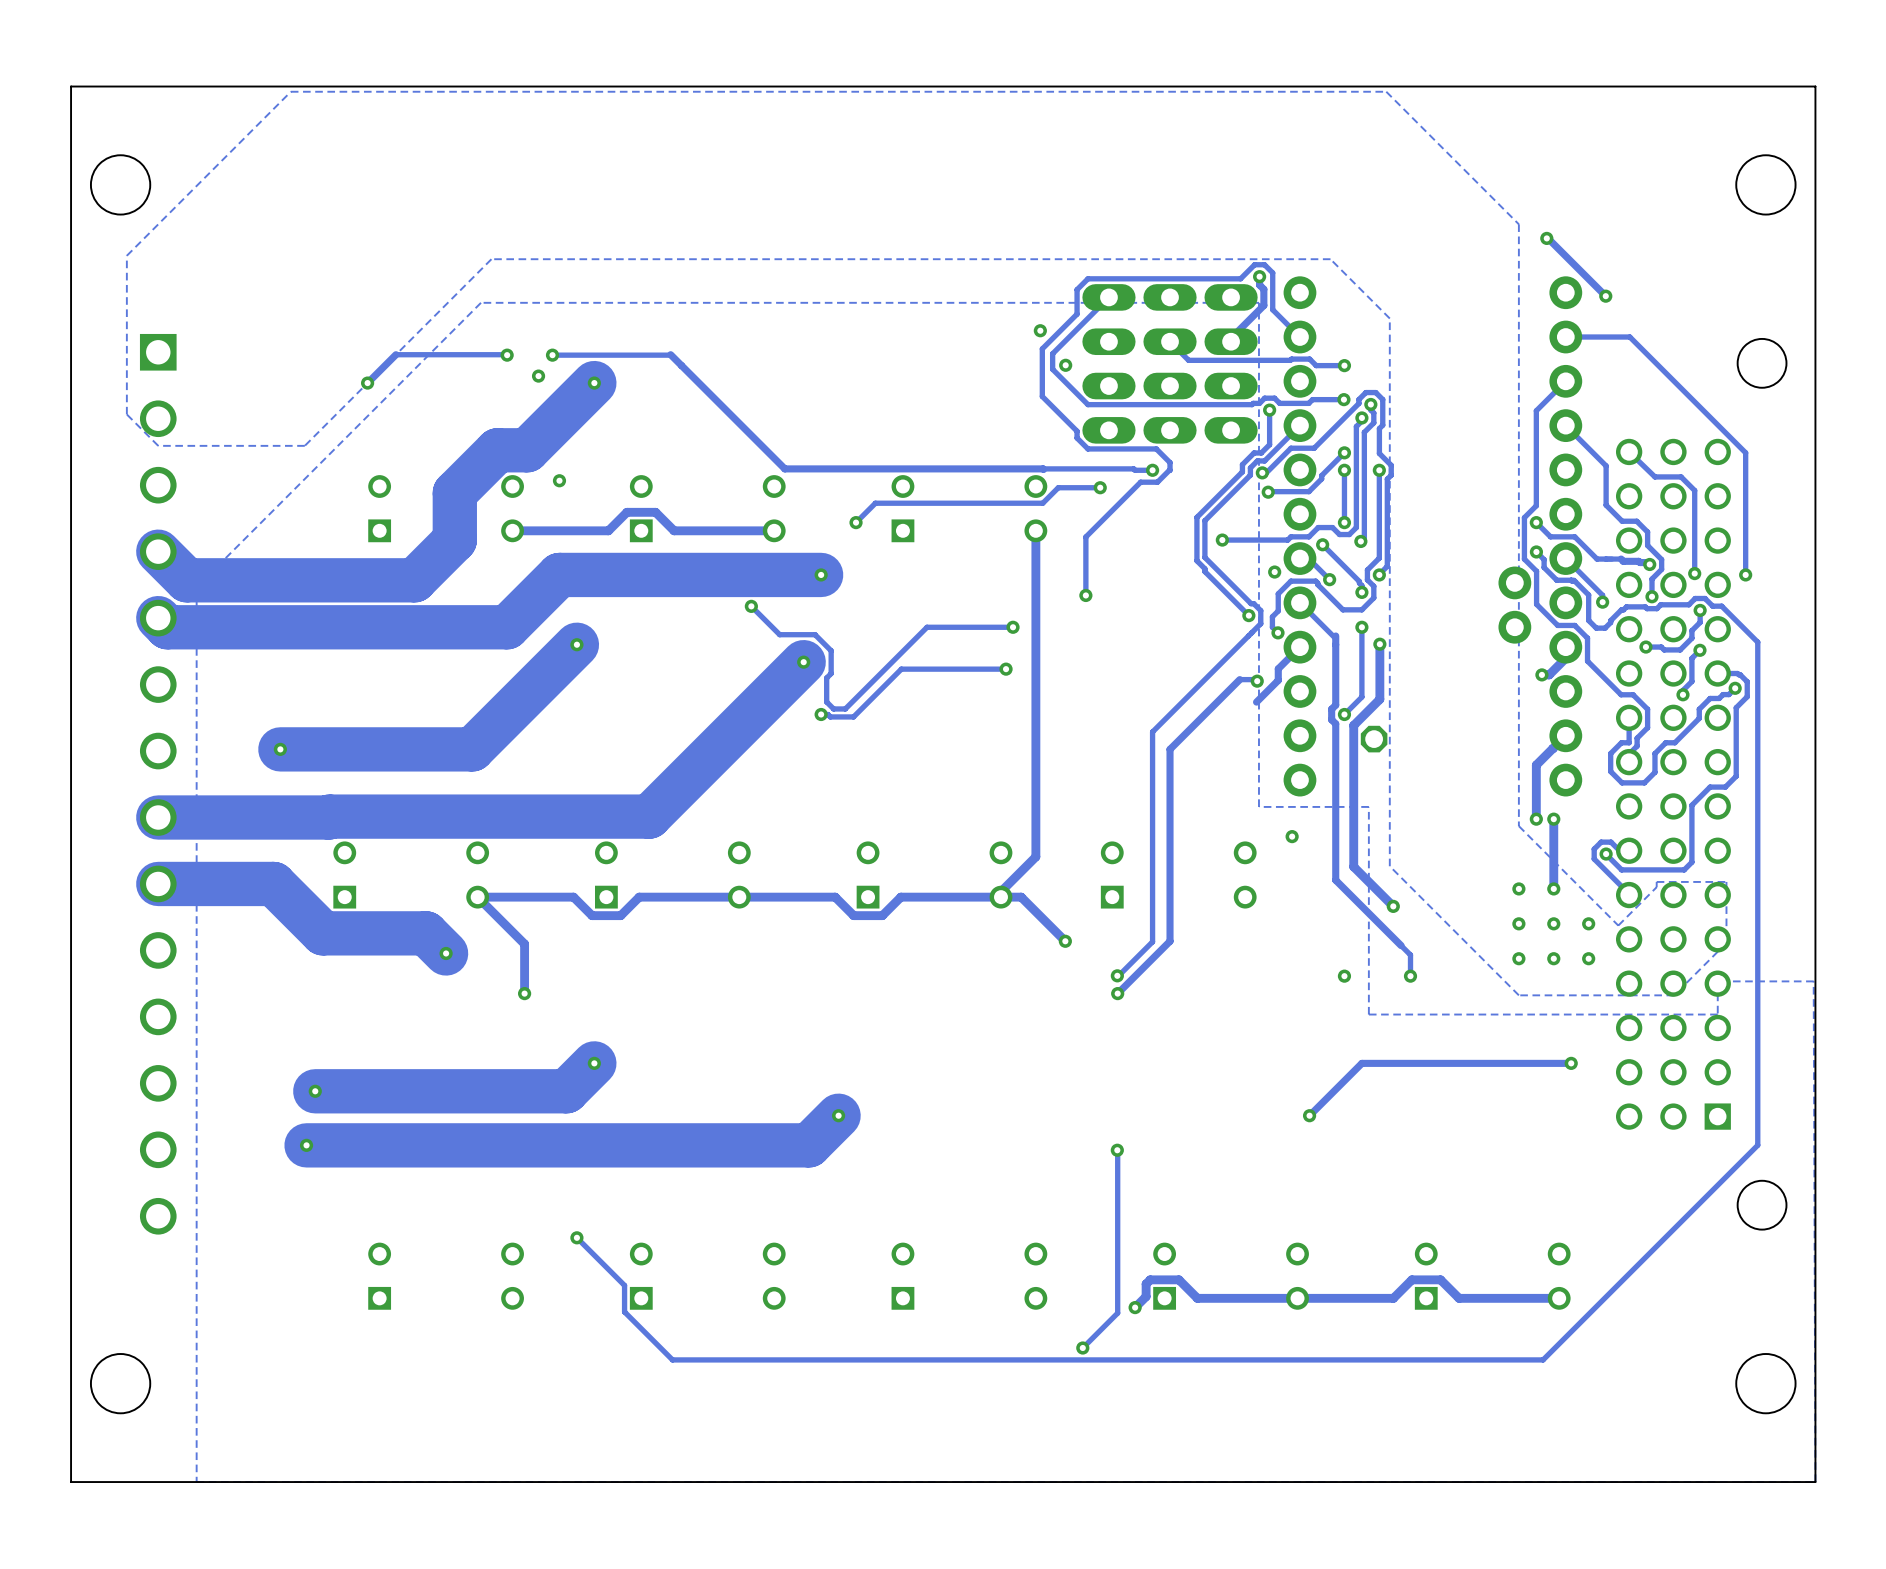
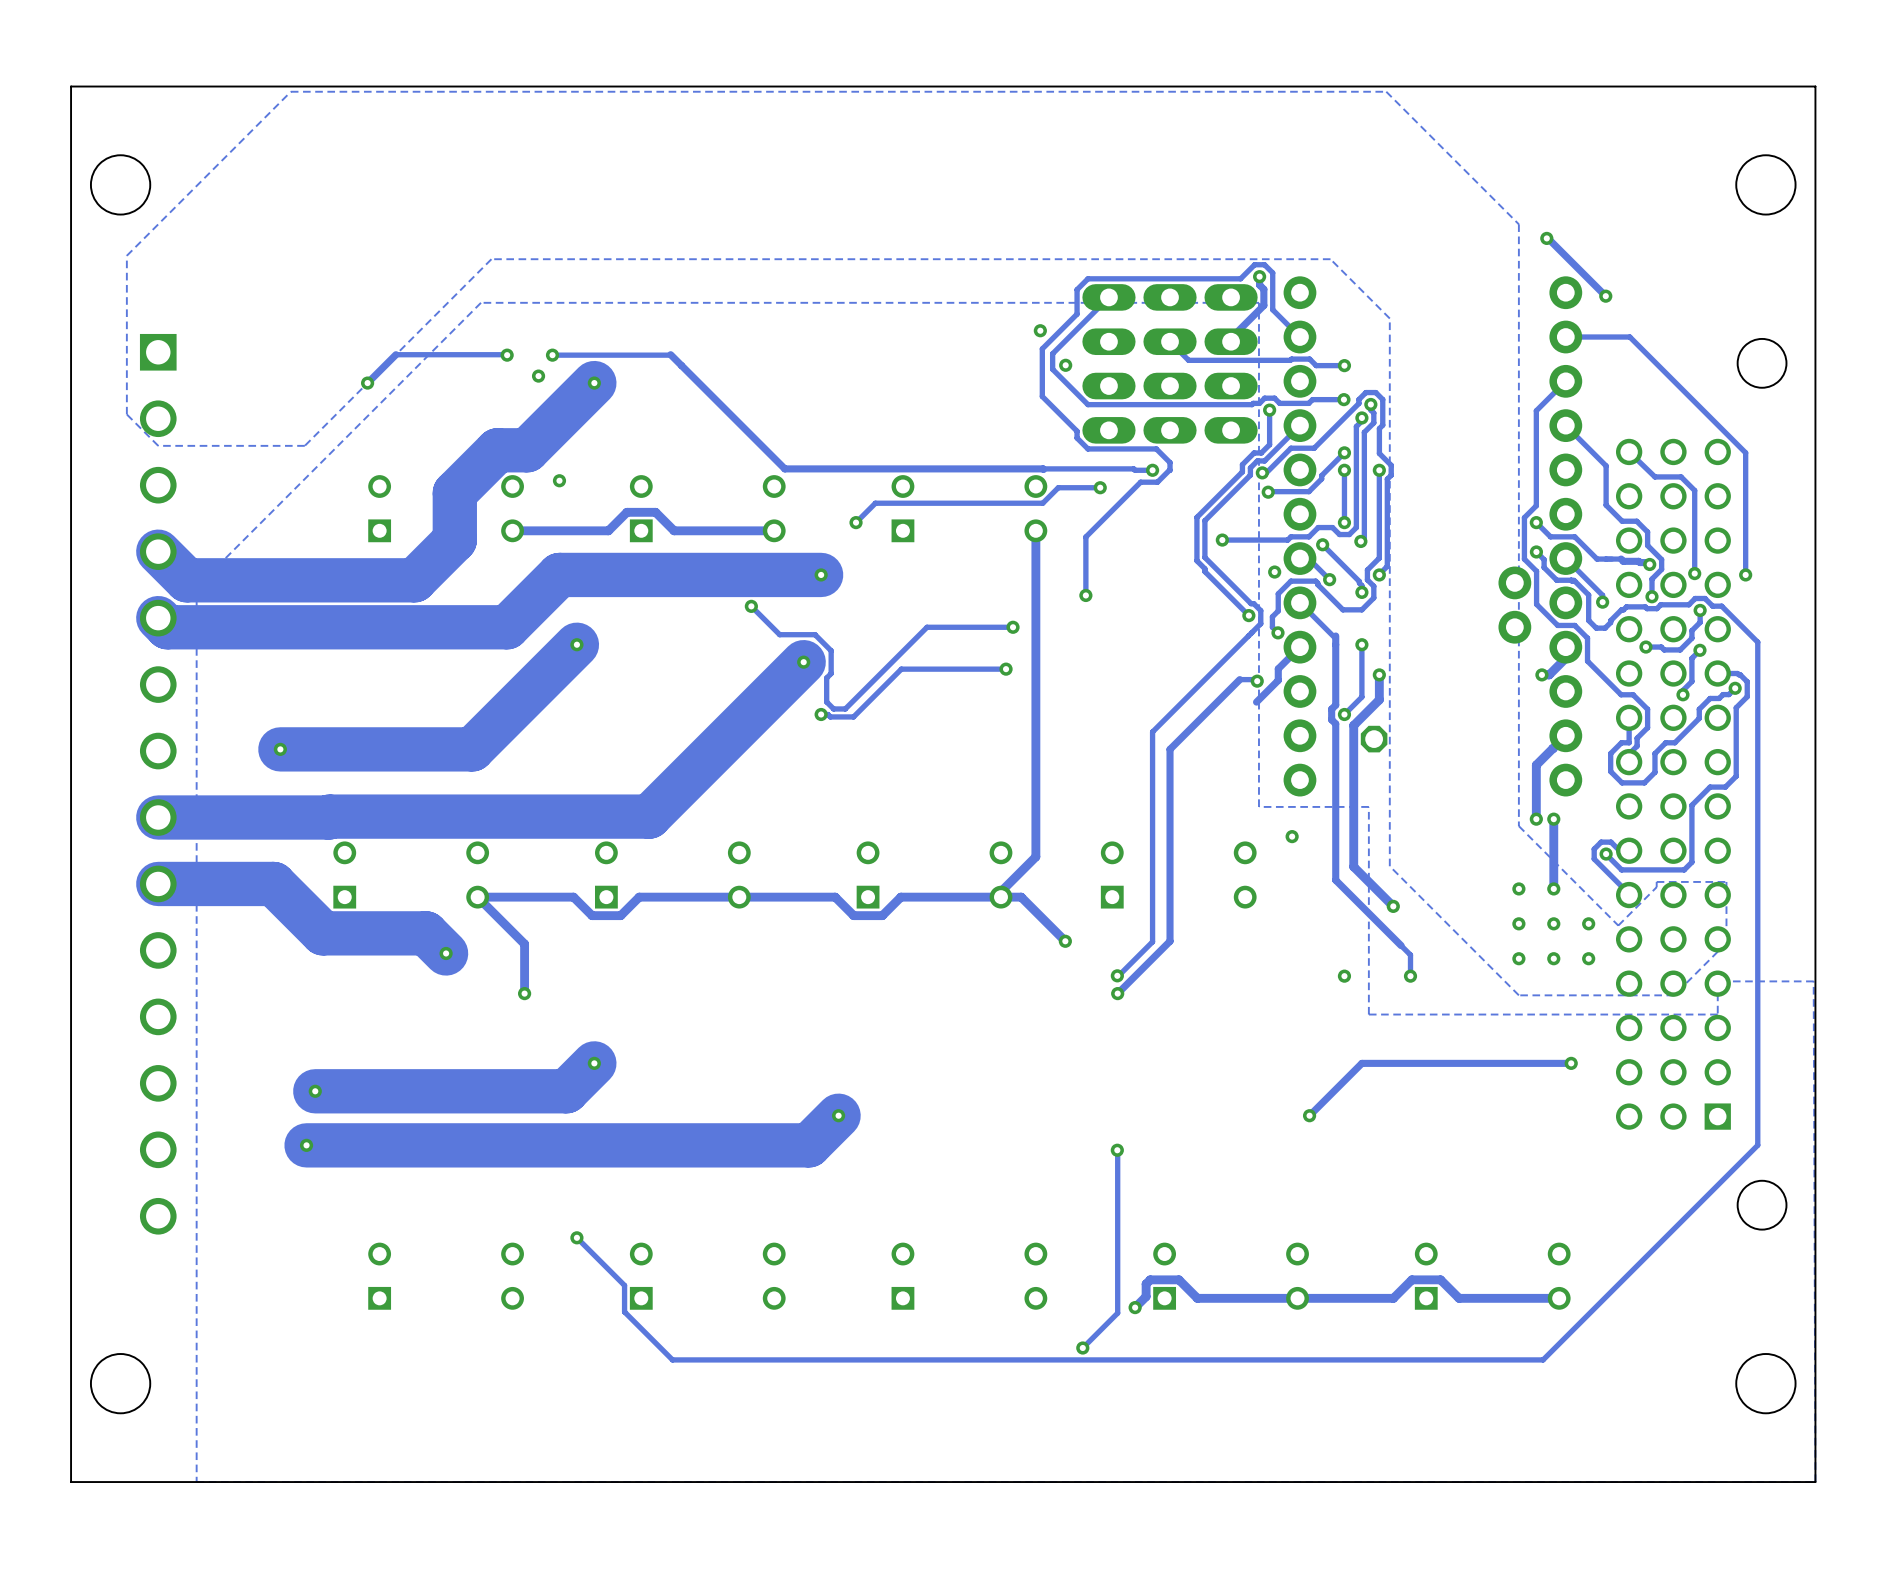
track: (1361, 627) (1361, 644) -> none
via: (1361, 627) -> none
via: none -> (1361, 644)
track: (1379, 644) (1379, 699) -> (1379, 674) (1379, 699)
via: (1379, 644) -> none
via: none -> (1379, 674)

